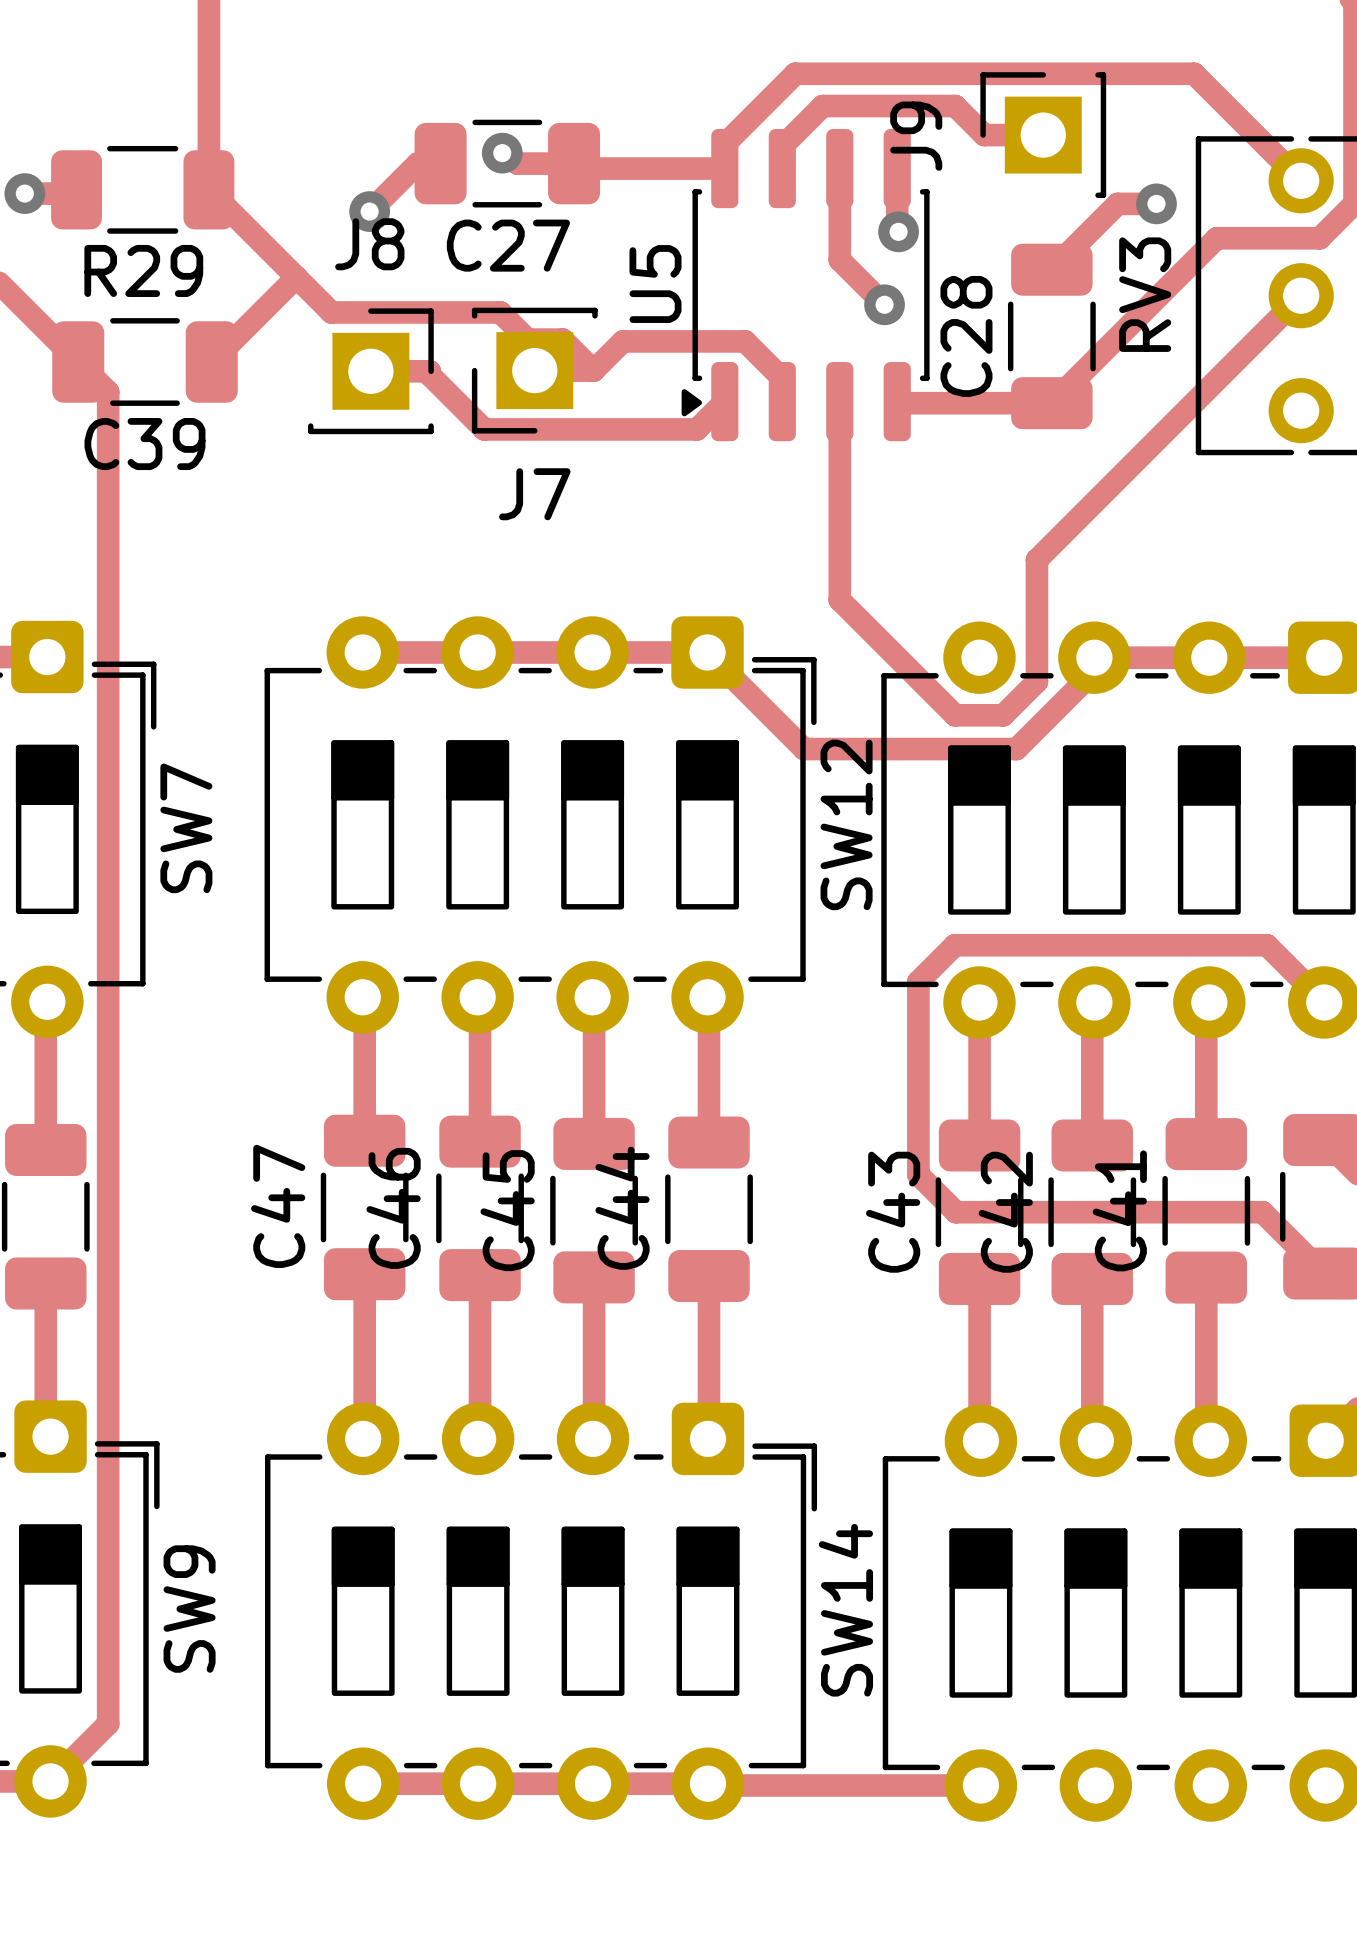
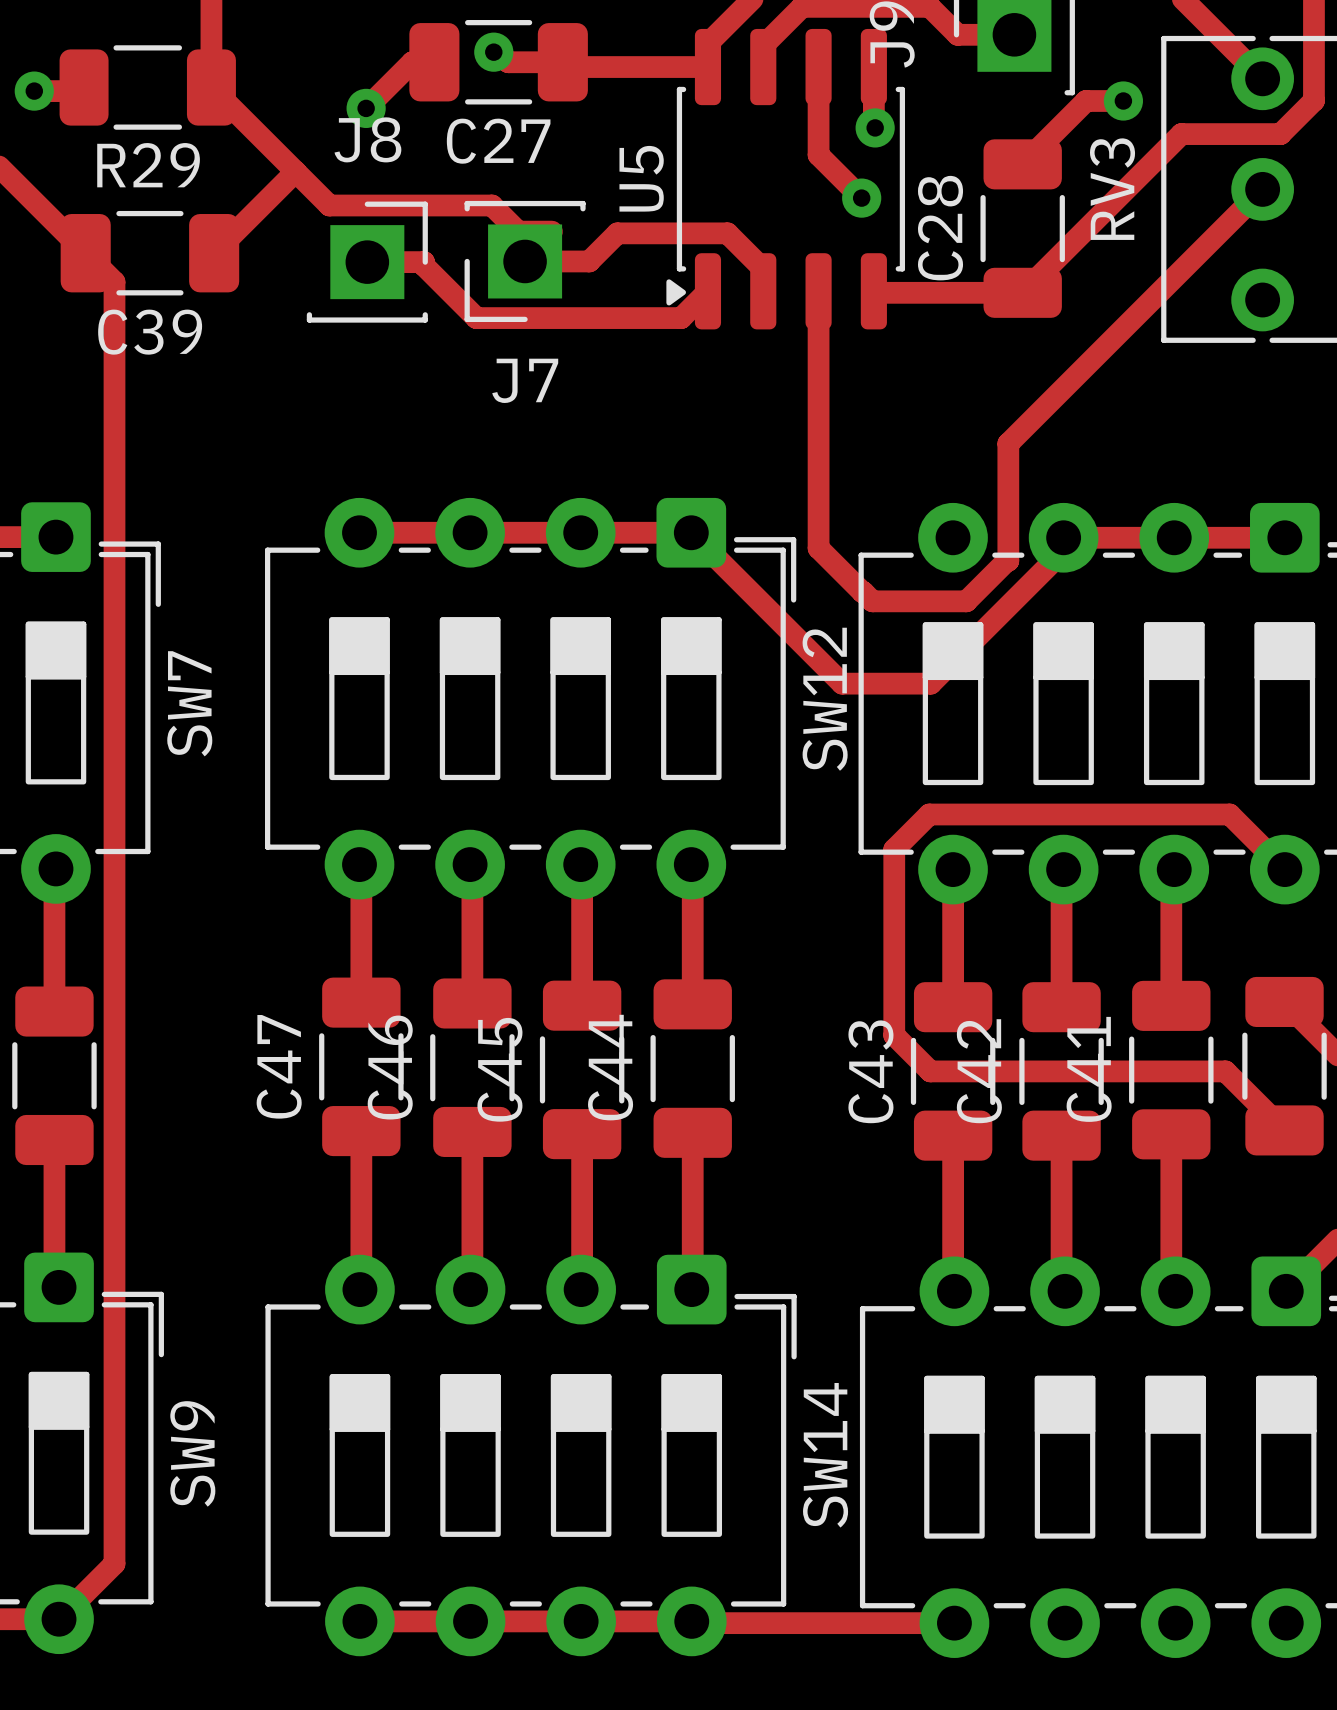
track: (562, 339) (593, 370) (622, 341) (630, 341) -> (581, 261) (589, 261) (617, 233)
track: (839, 599) (955, 715) (1003, 715) (1036, 681) -> (863, 592) (872, 601) (966, 601) (1008, 560)
track: none -> (818, 482) (818, 548) (862, 592)
track: (804, 749) (1016, 749) -> (784, 625) (842, 683) (930, 683) (988, 625)

